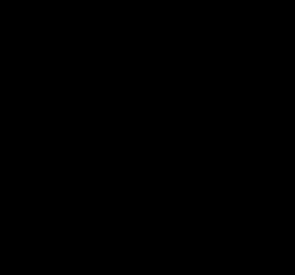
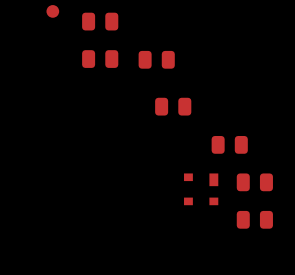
part: none -> (52, 11)
part: none -> (100, 21)
part: none -> (100, 59)
part: none -> (156, 59)
part: none -> (173, 106)
part: none -> (229, 144)
part: none -> (254, 182)
part: none -> (201, 189)
part: none -> (254, 219)

